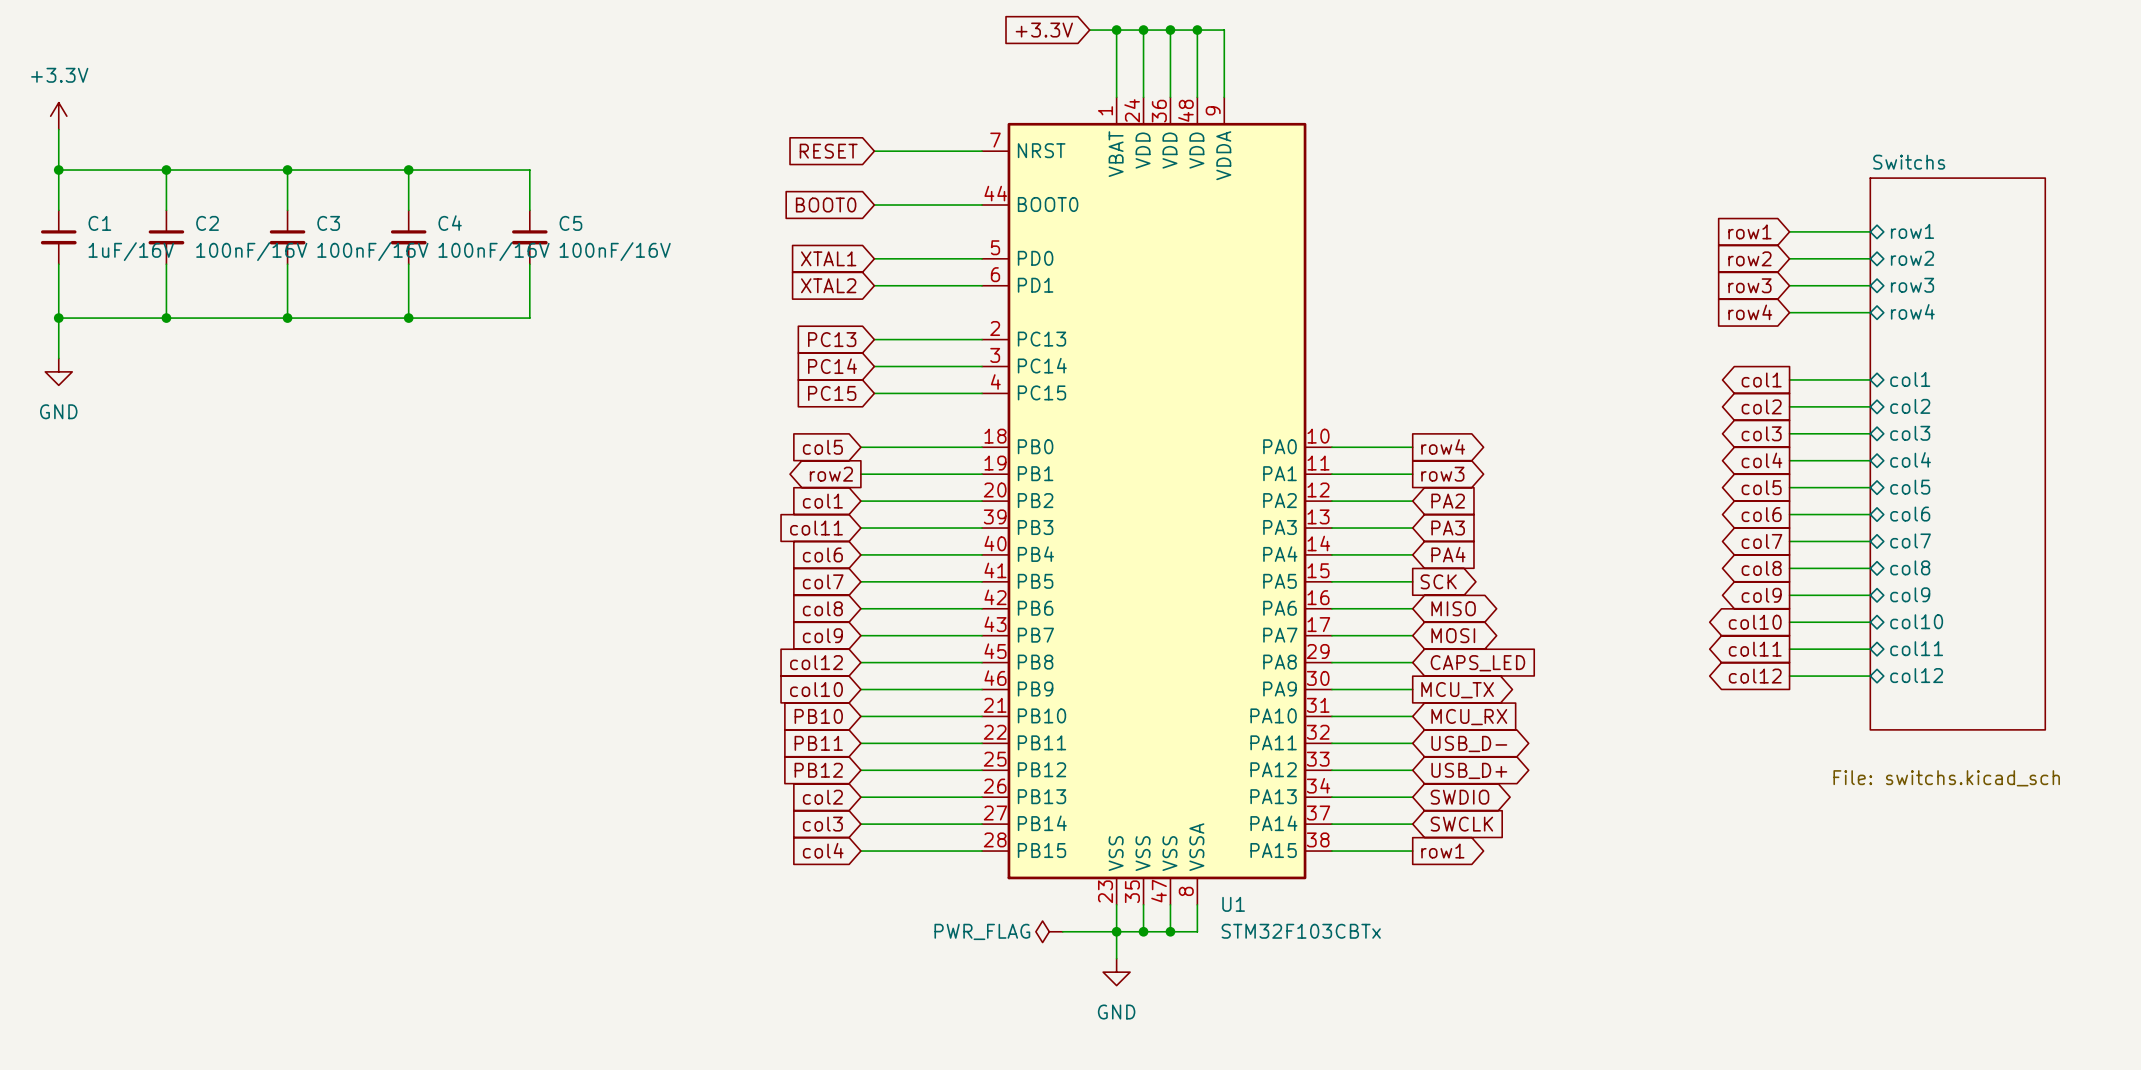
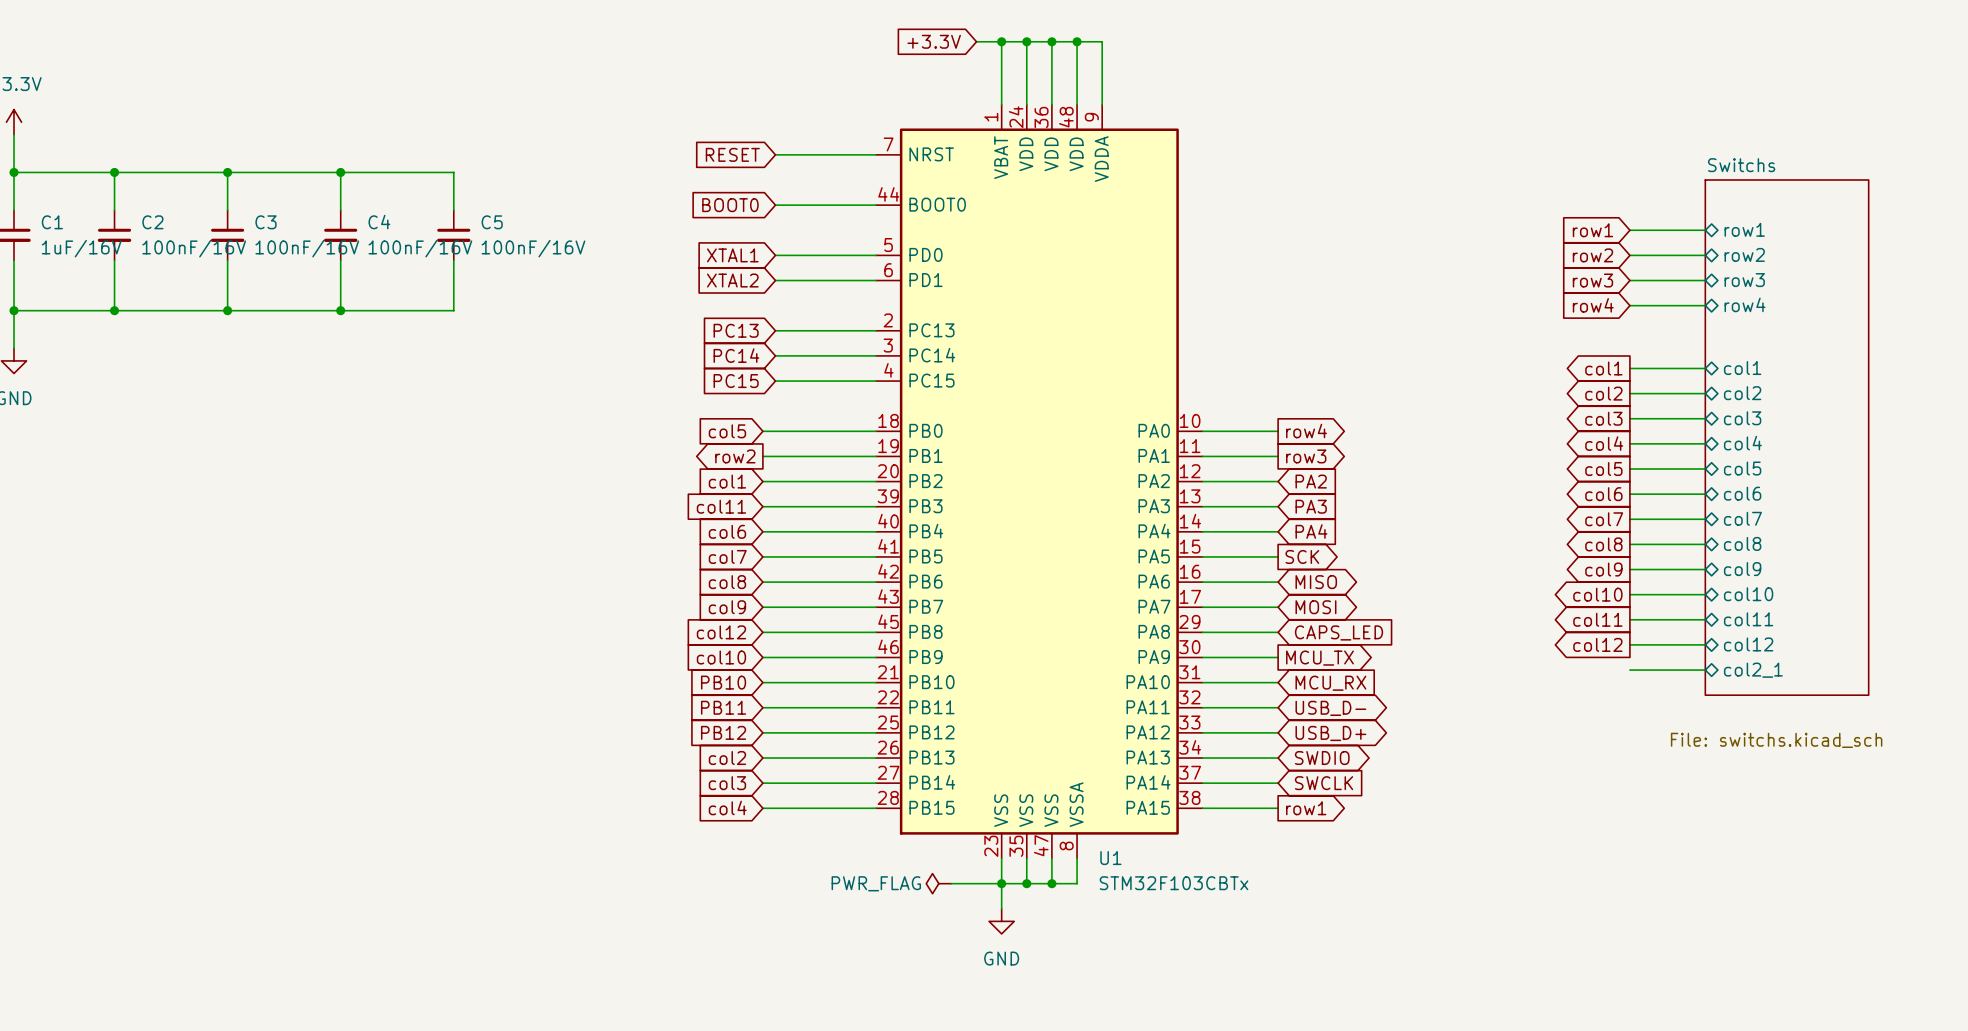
wire: none -> (1629, 670) (1705, 670)
sheet pin: none -> col2_1 (1753, 670)

